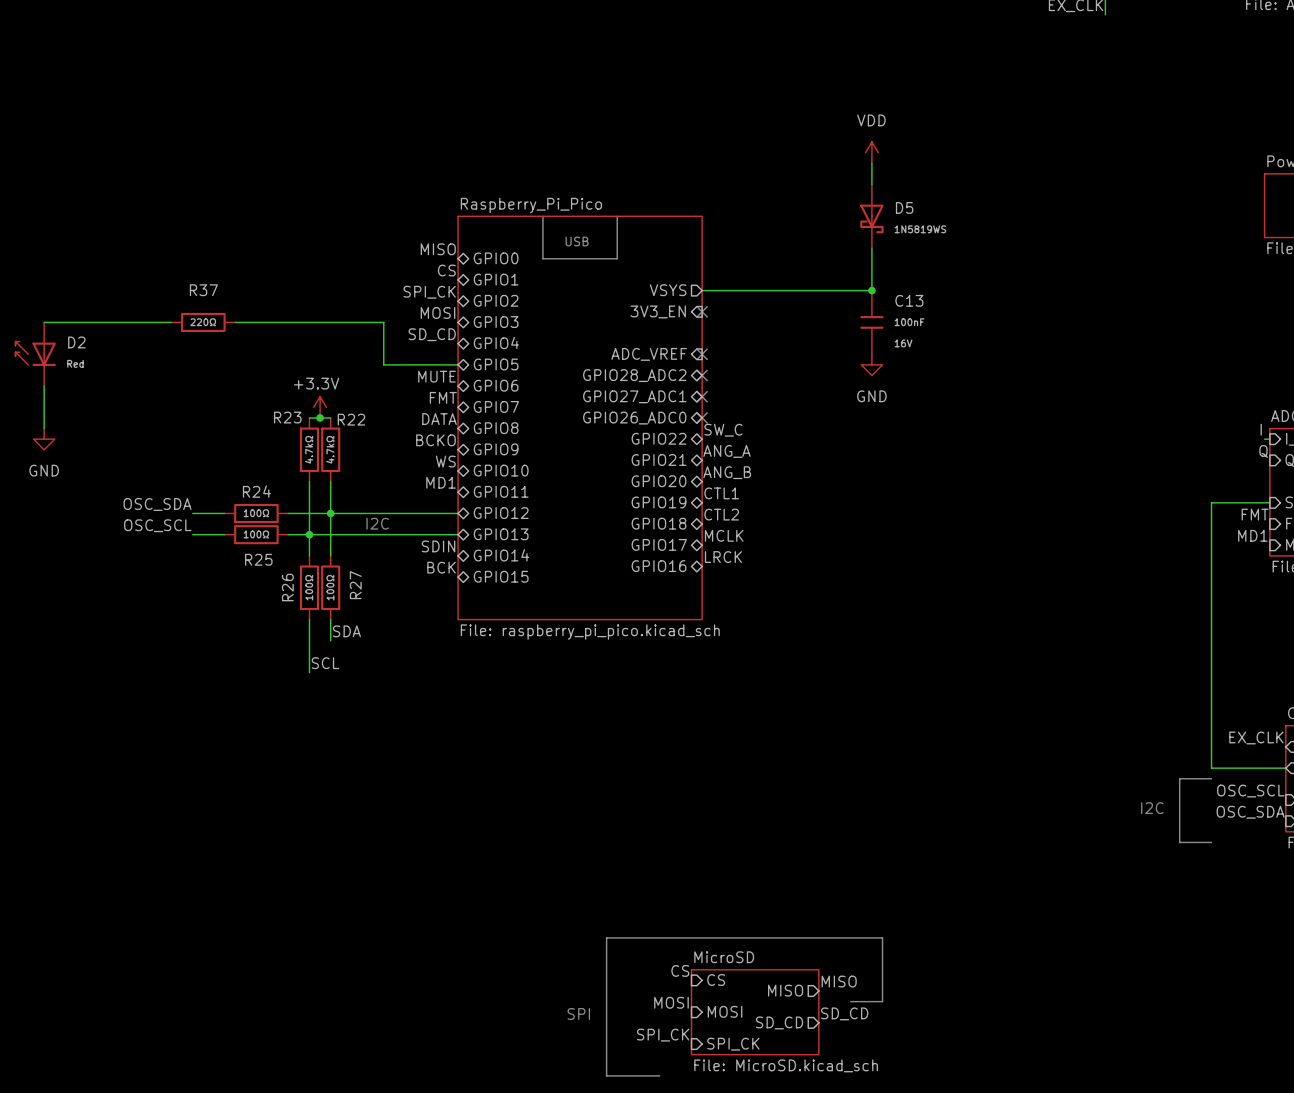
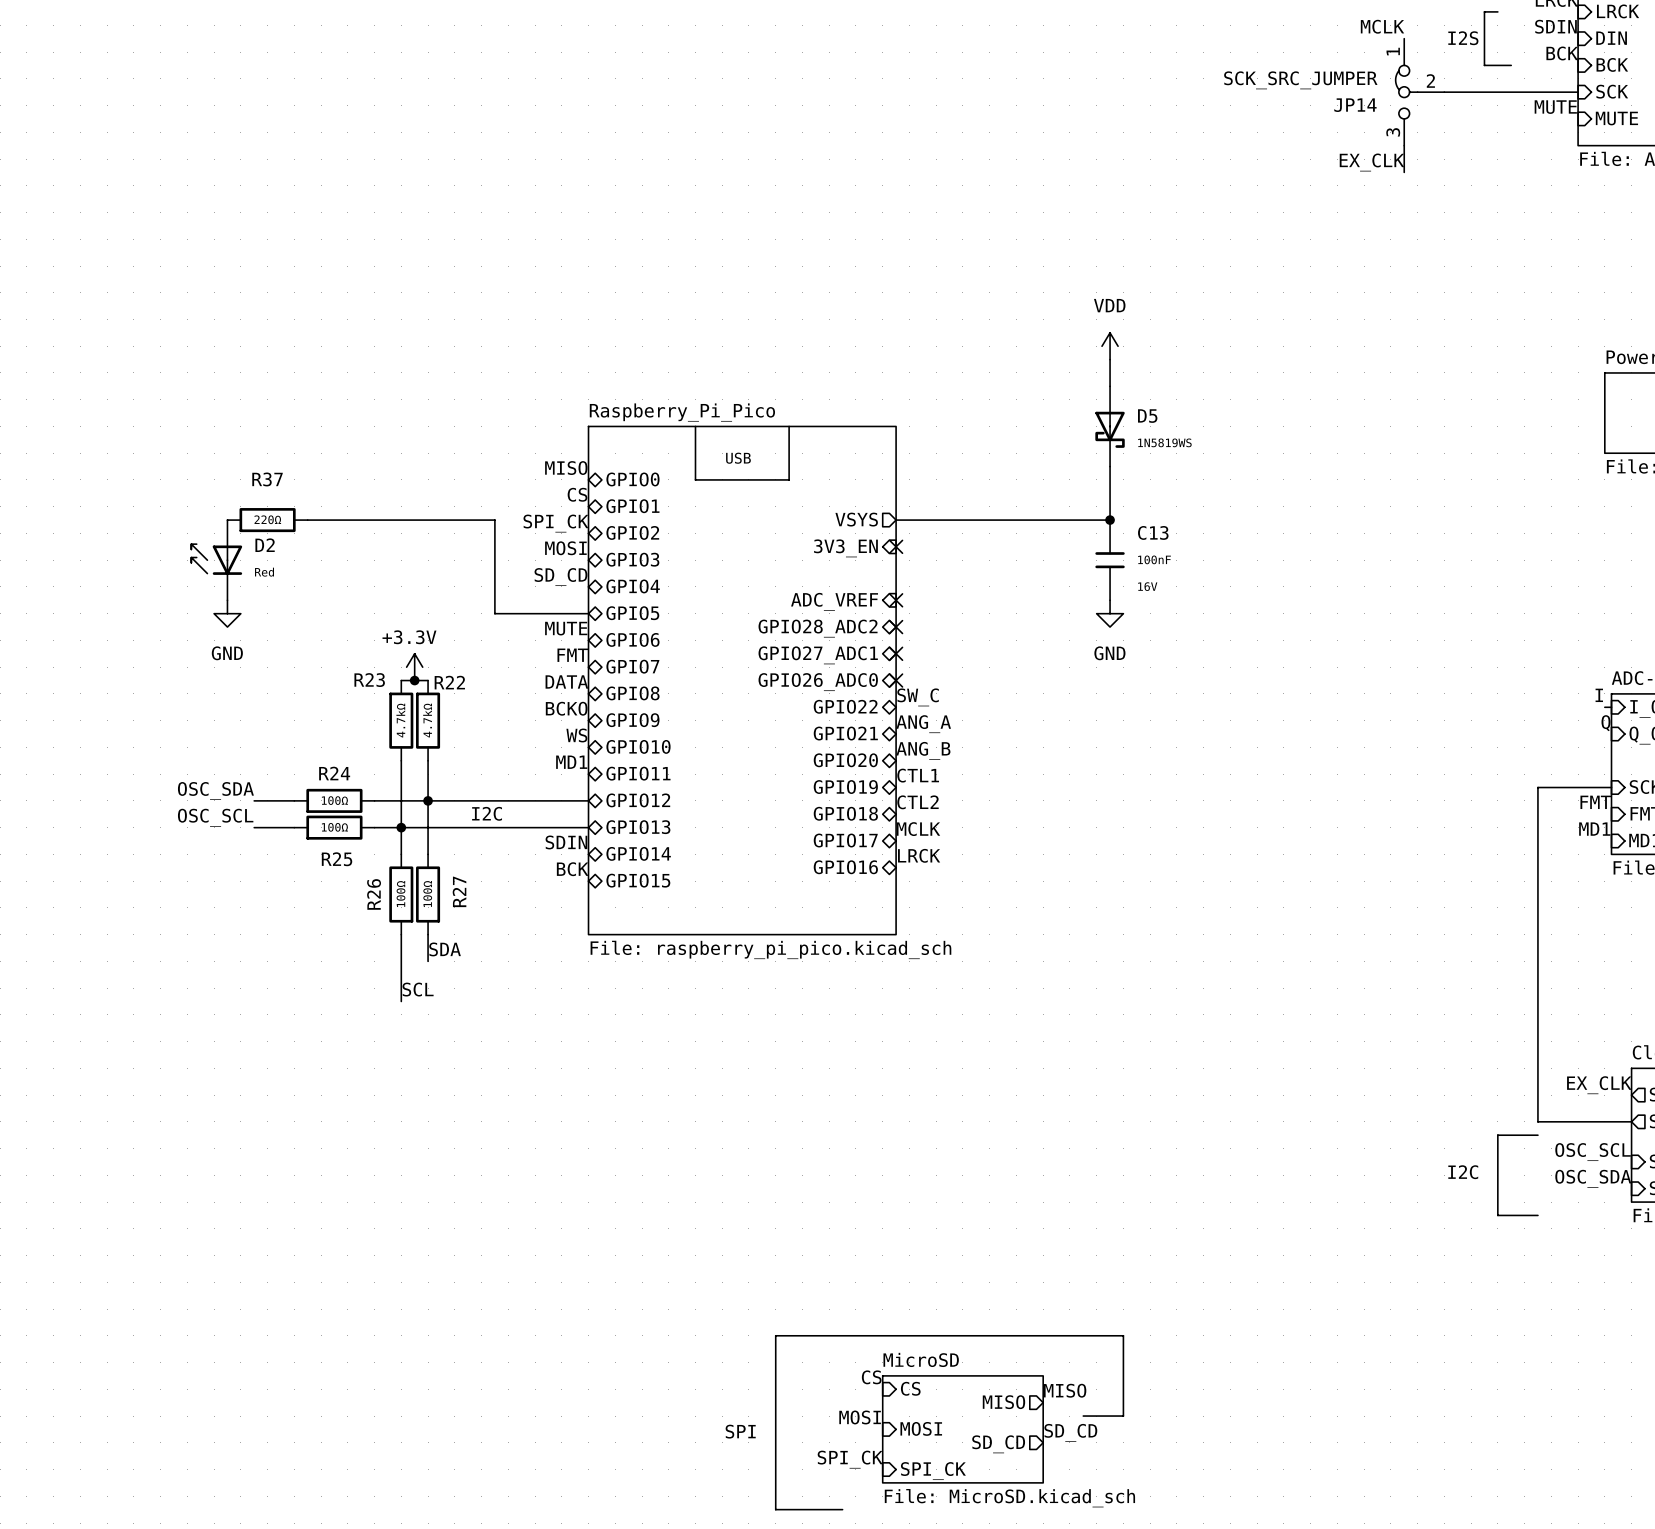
wire: (44, 322) (171, 322) -> none
R37 position: (203, 322) -> (267, 520)
wire: (235, 322) (383, 322) -> (307, 520) (494, 520) (494, 560)
D2 position: (35, 354) -> (216, 560)
wire: (44, 386) (44, 428) -> none
power symbol position: GND (44, 439) -> GND (227, 613)

